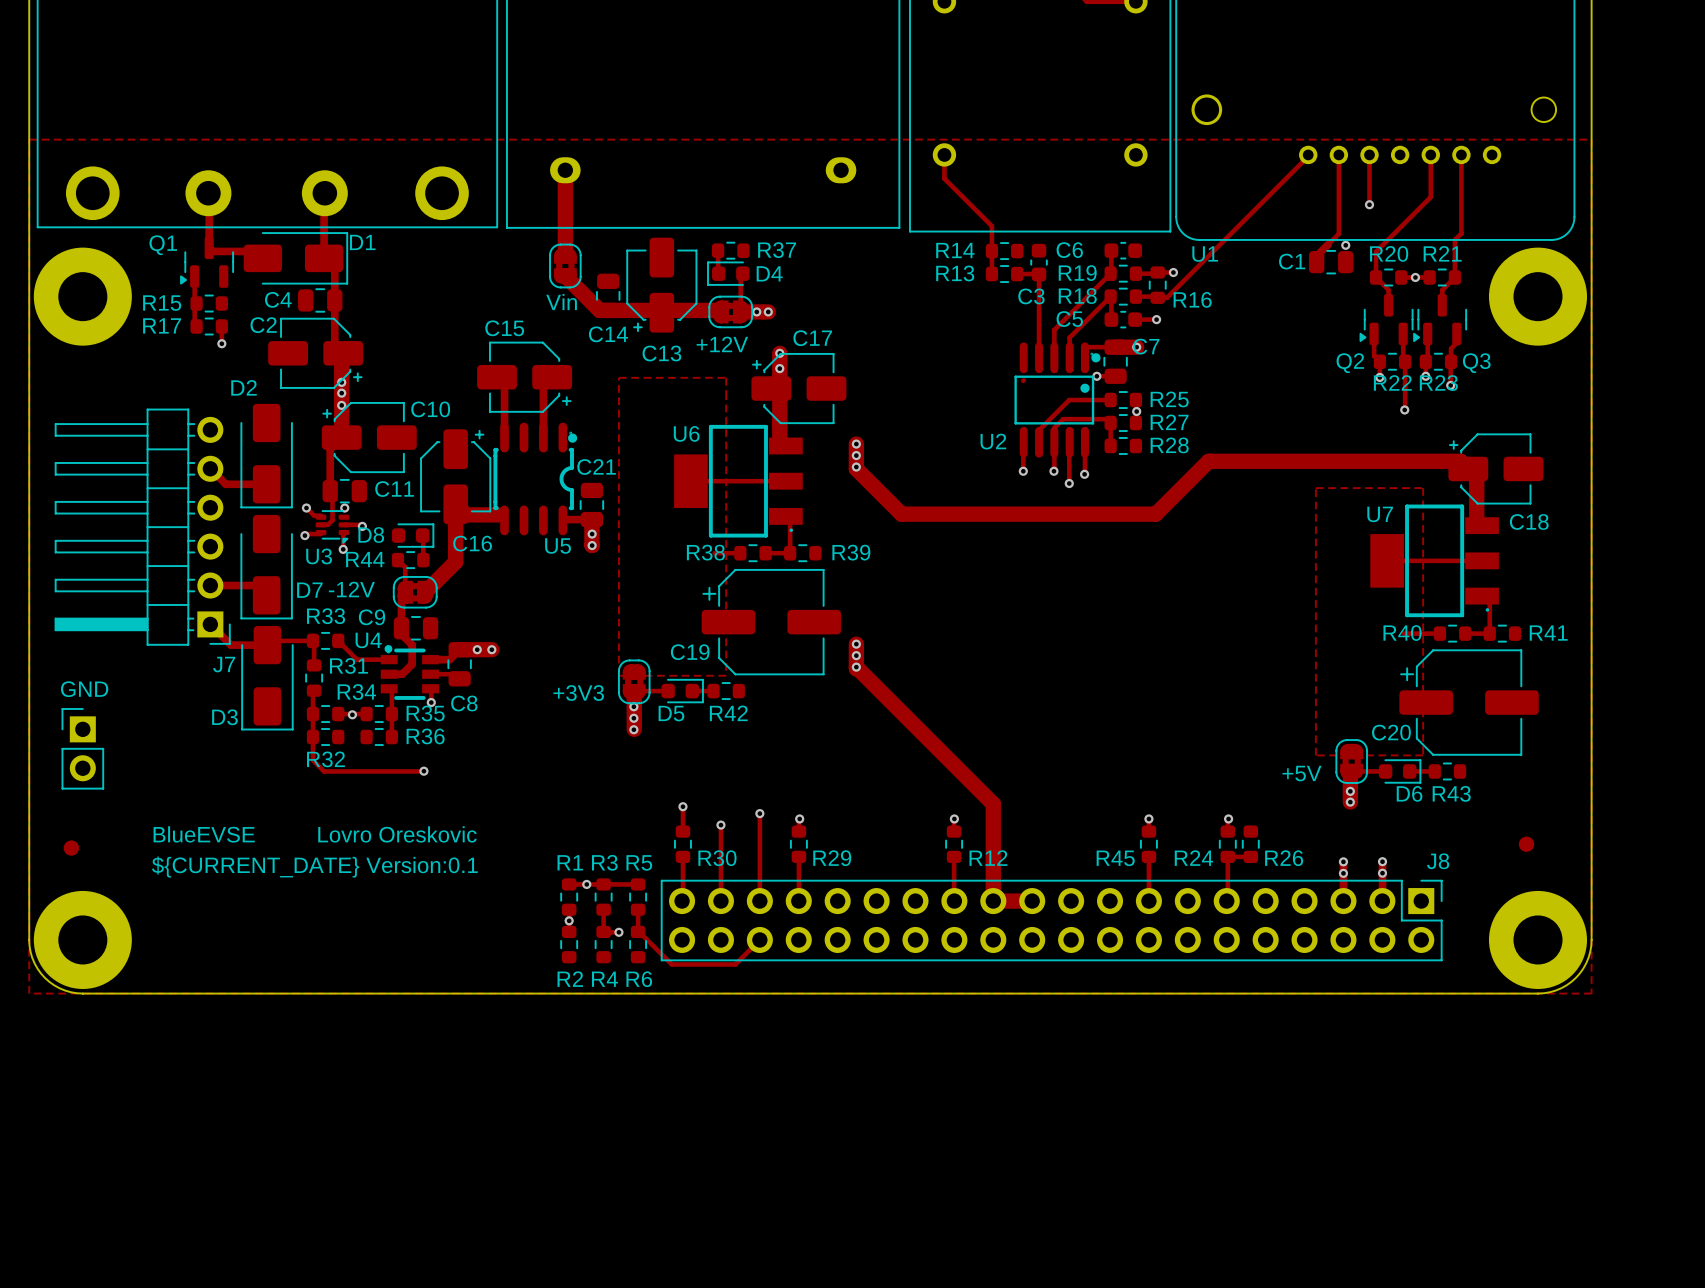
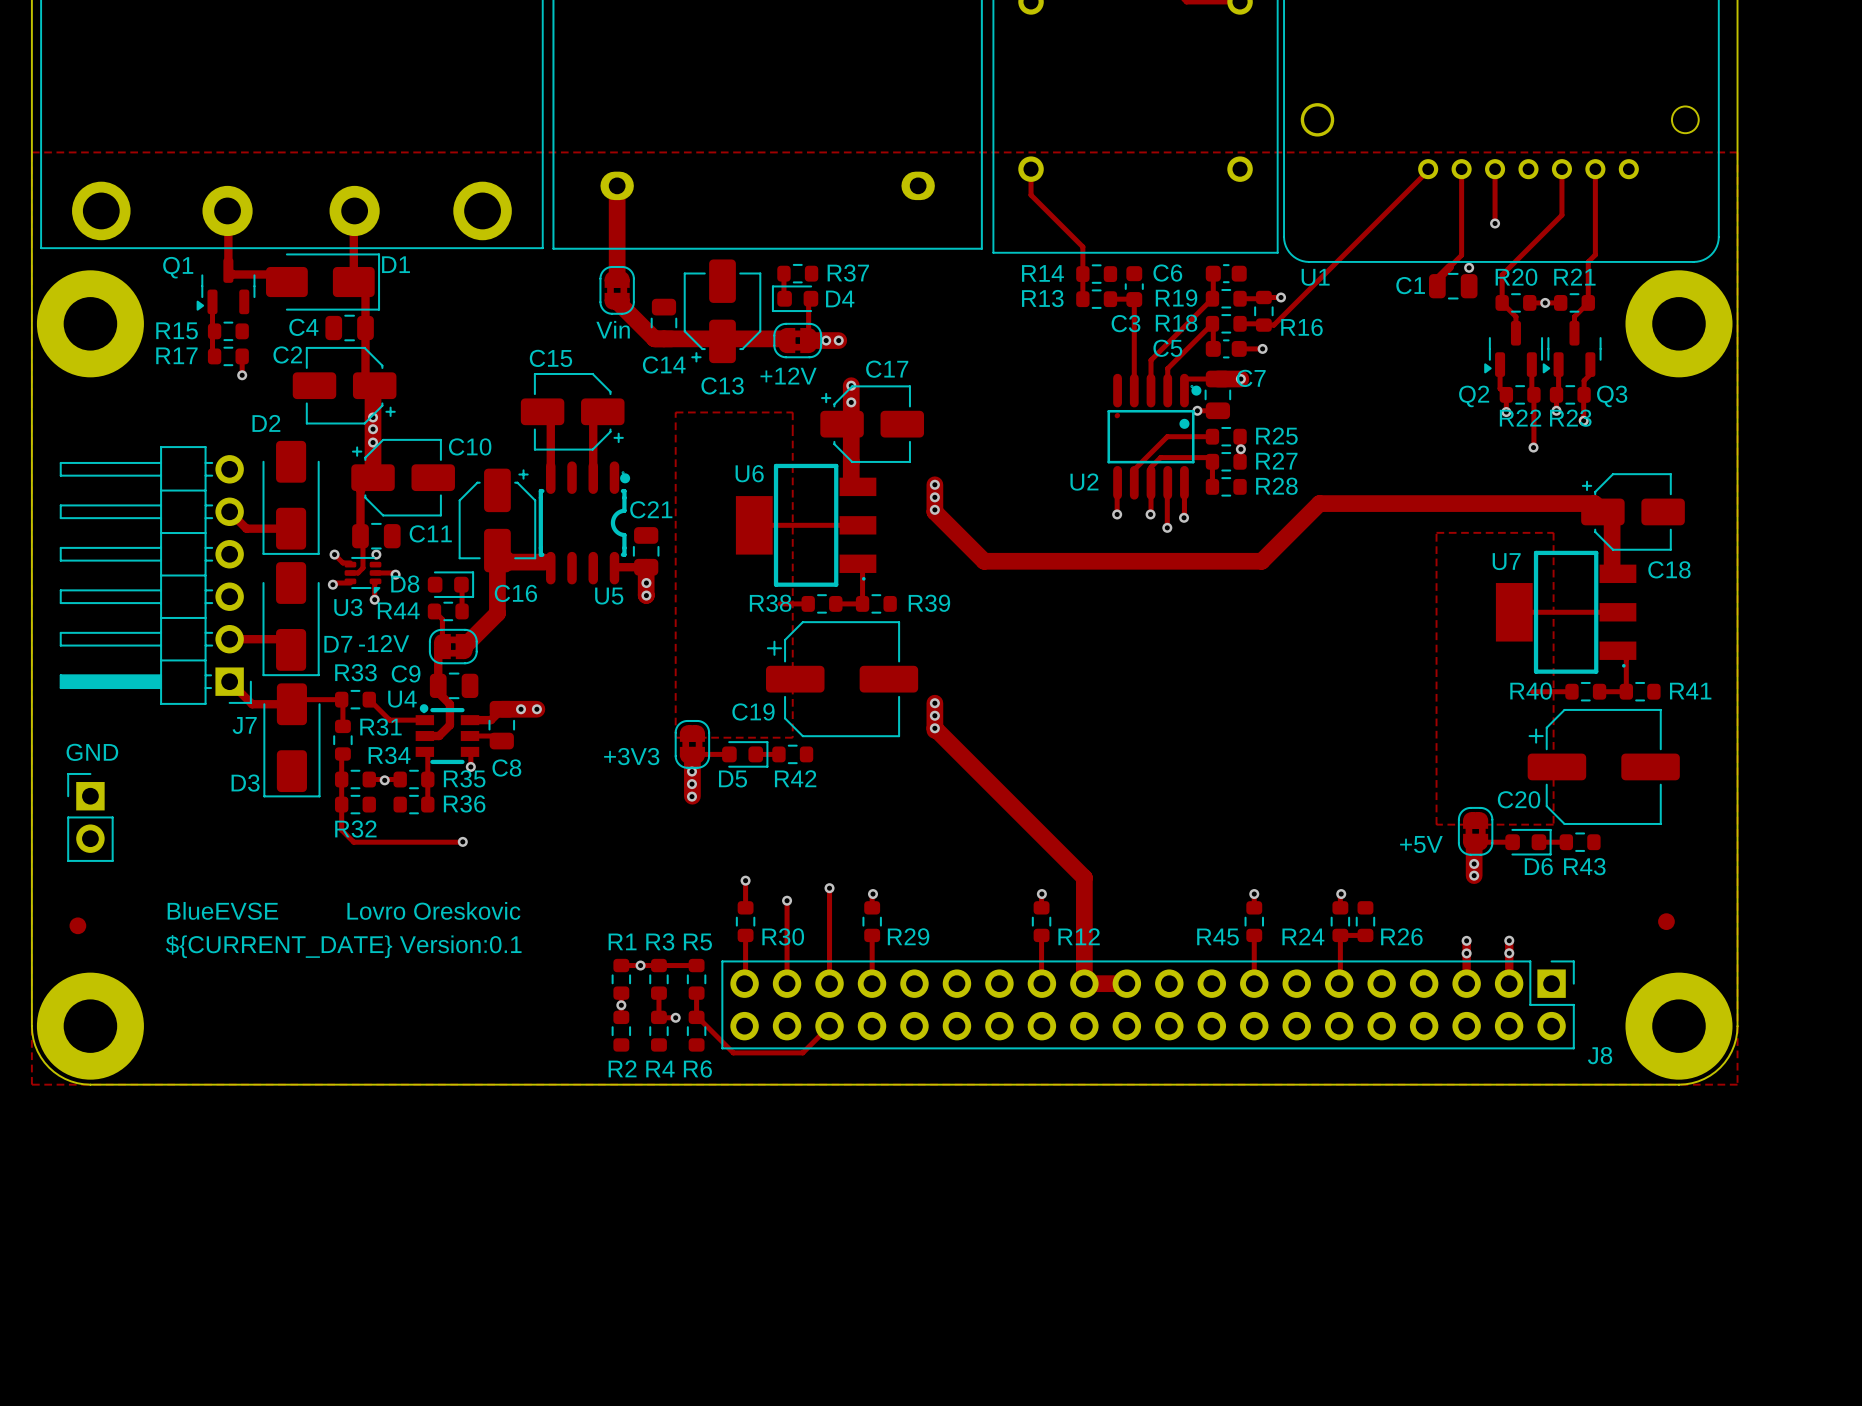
J8 name position: J8 (1438, 861) -> J8 (1600, 1055)

